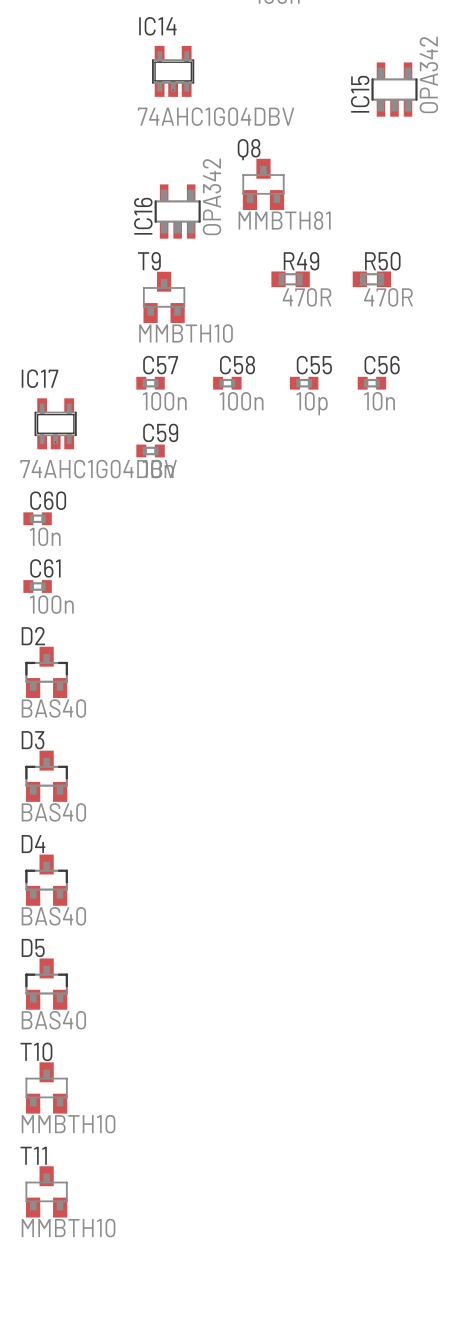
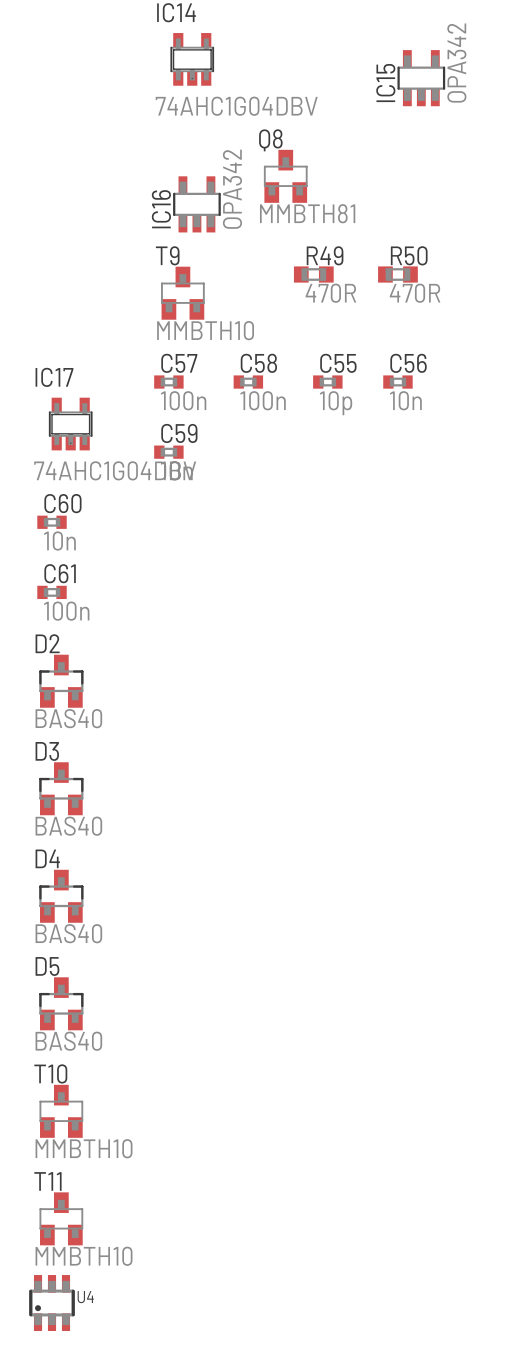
U4: none -> (52, 1303)

